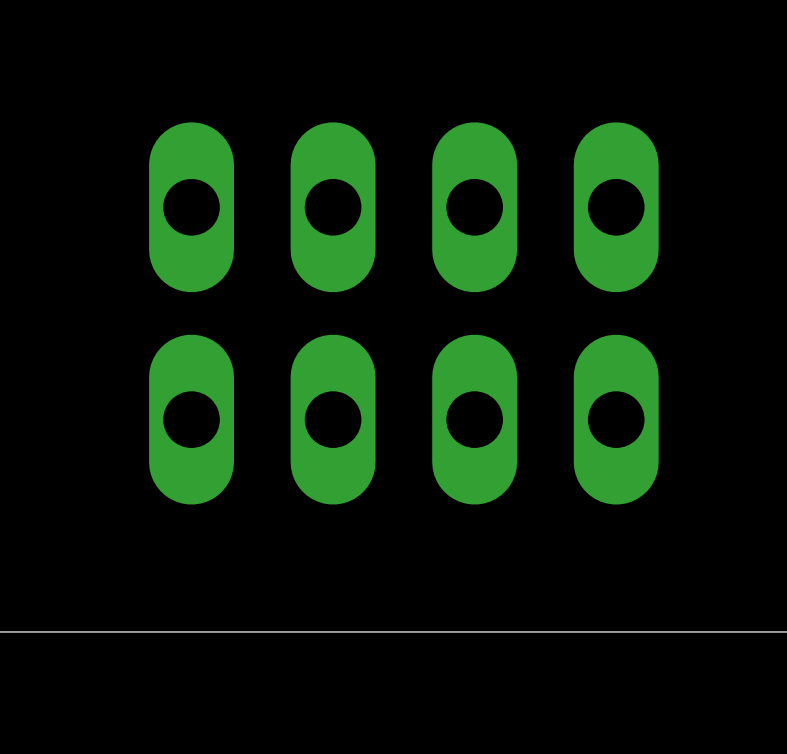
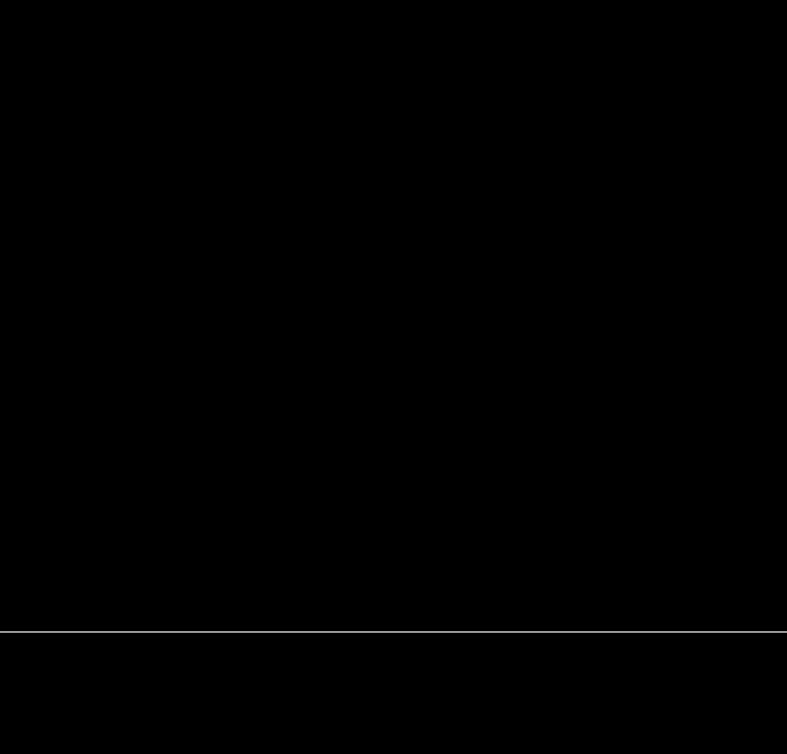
part: (403, 207) -> none
part: (403, 419) -> none

